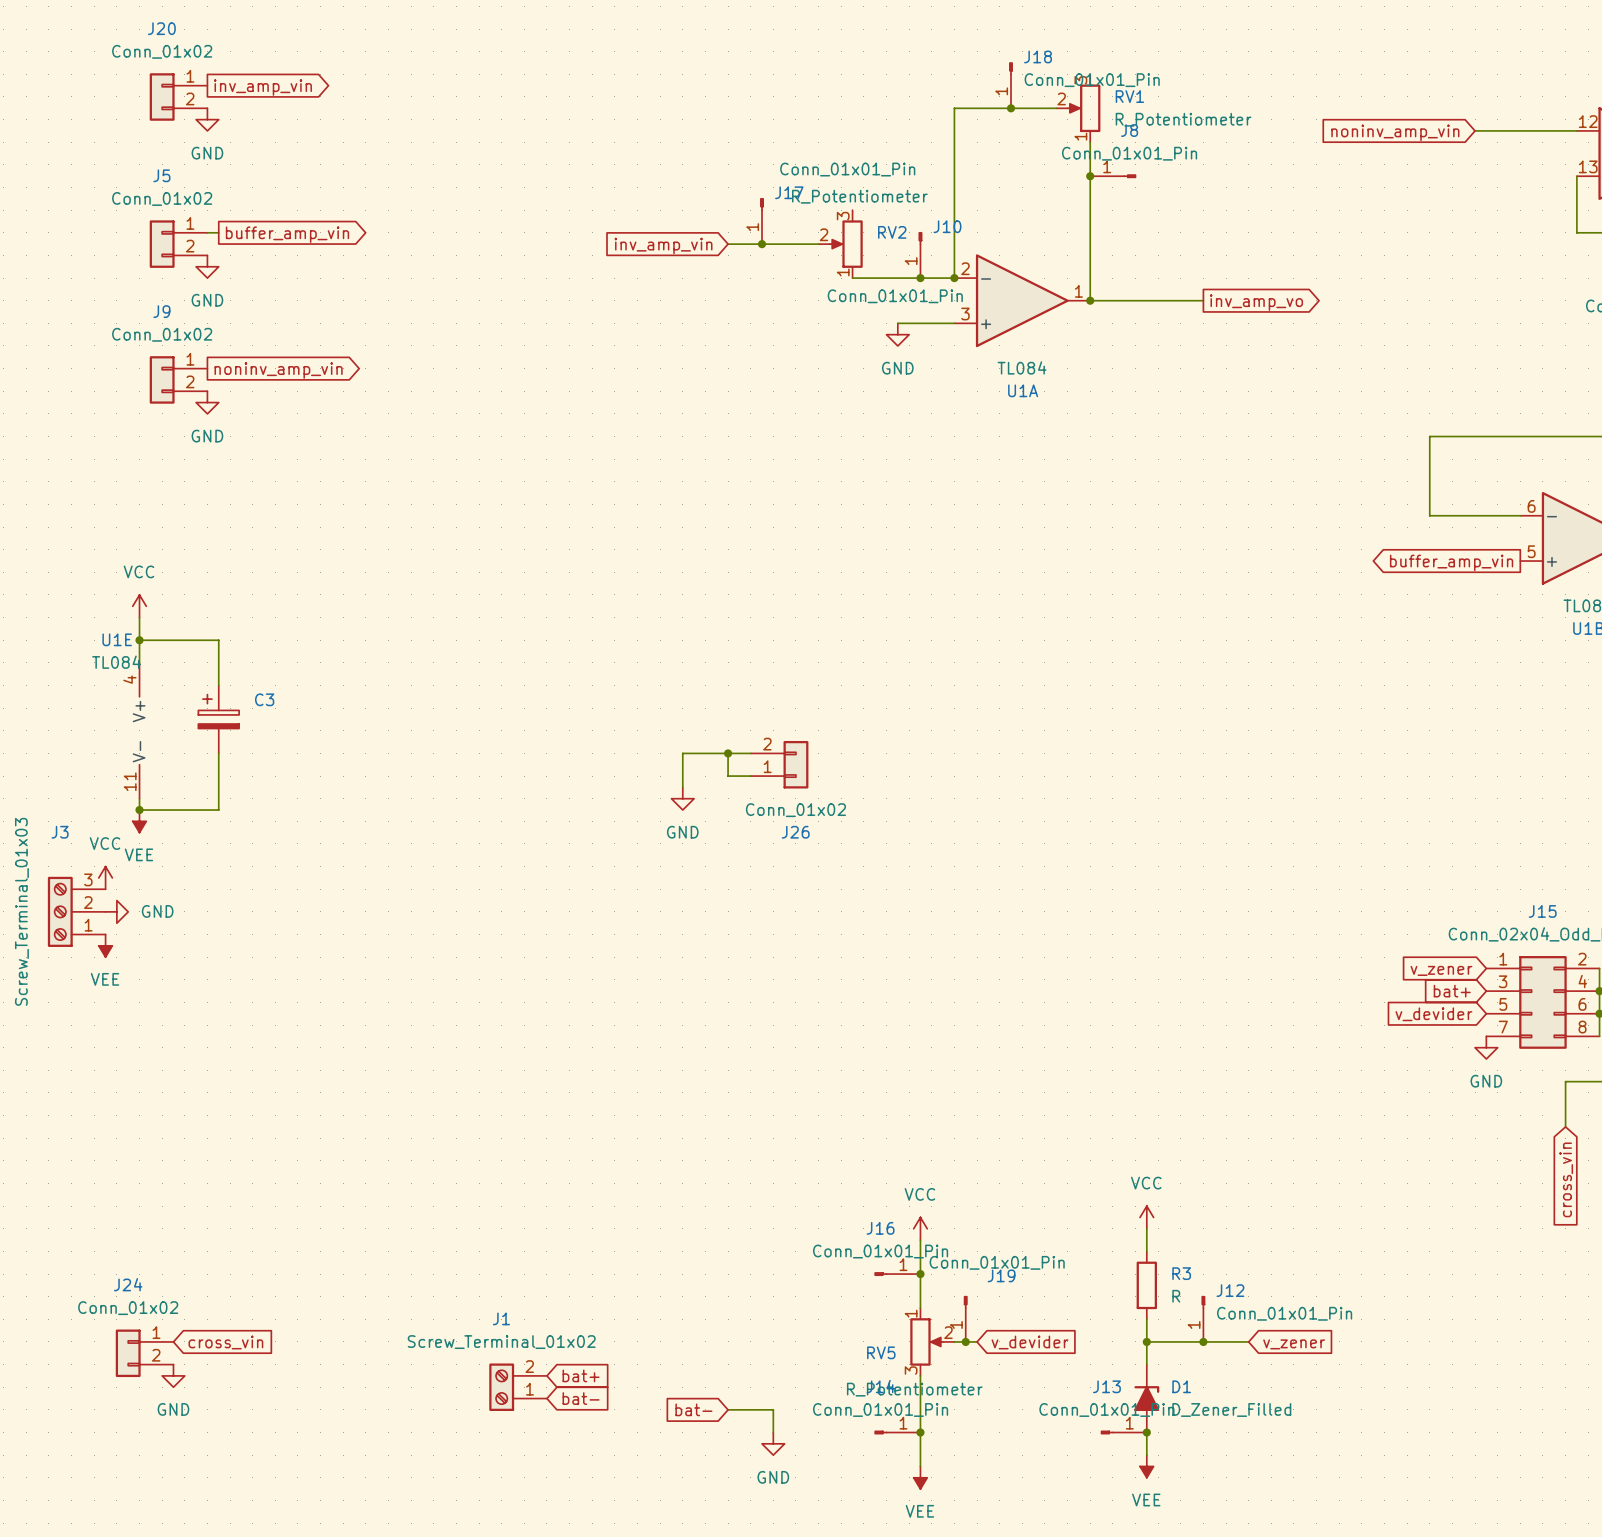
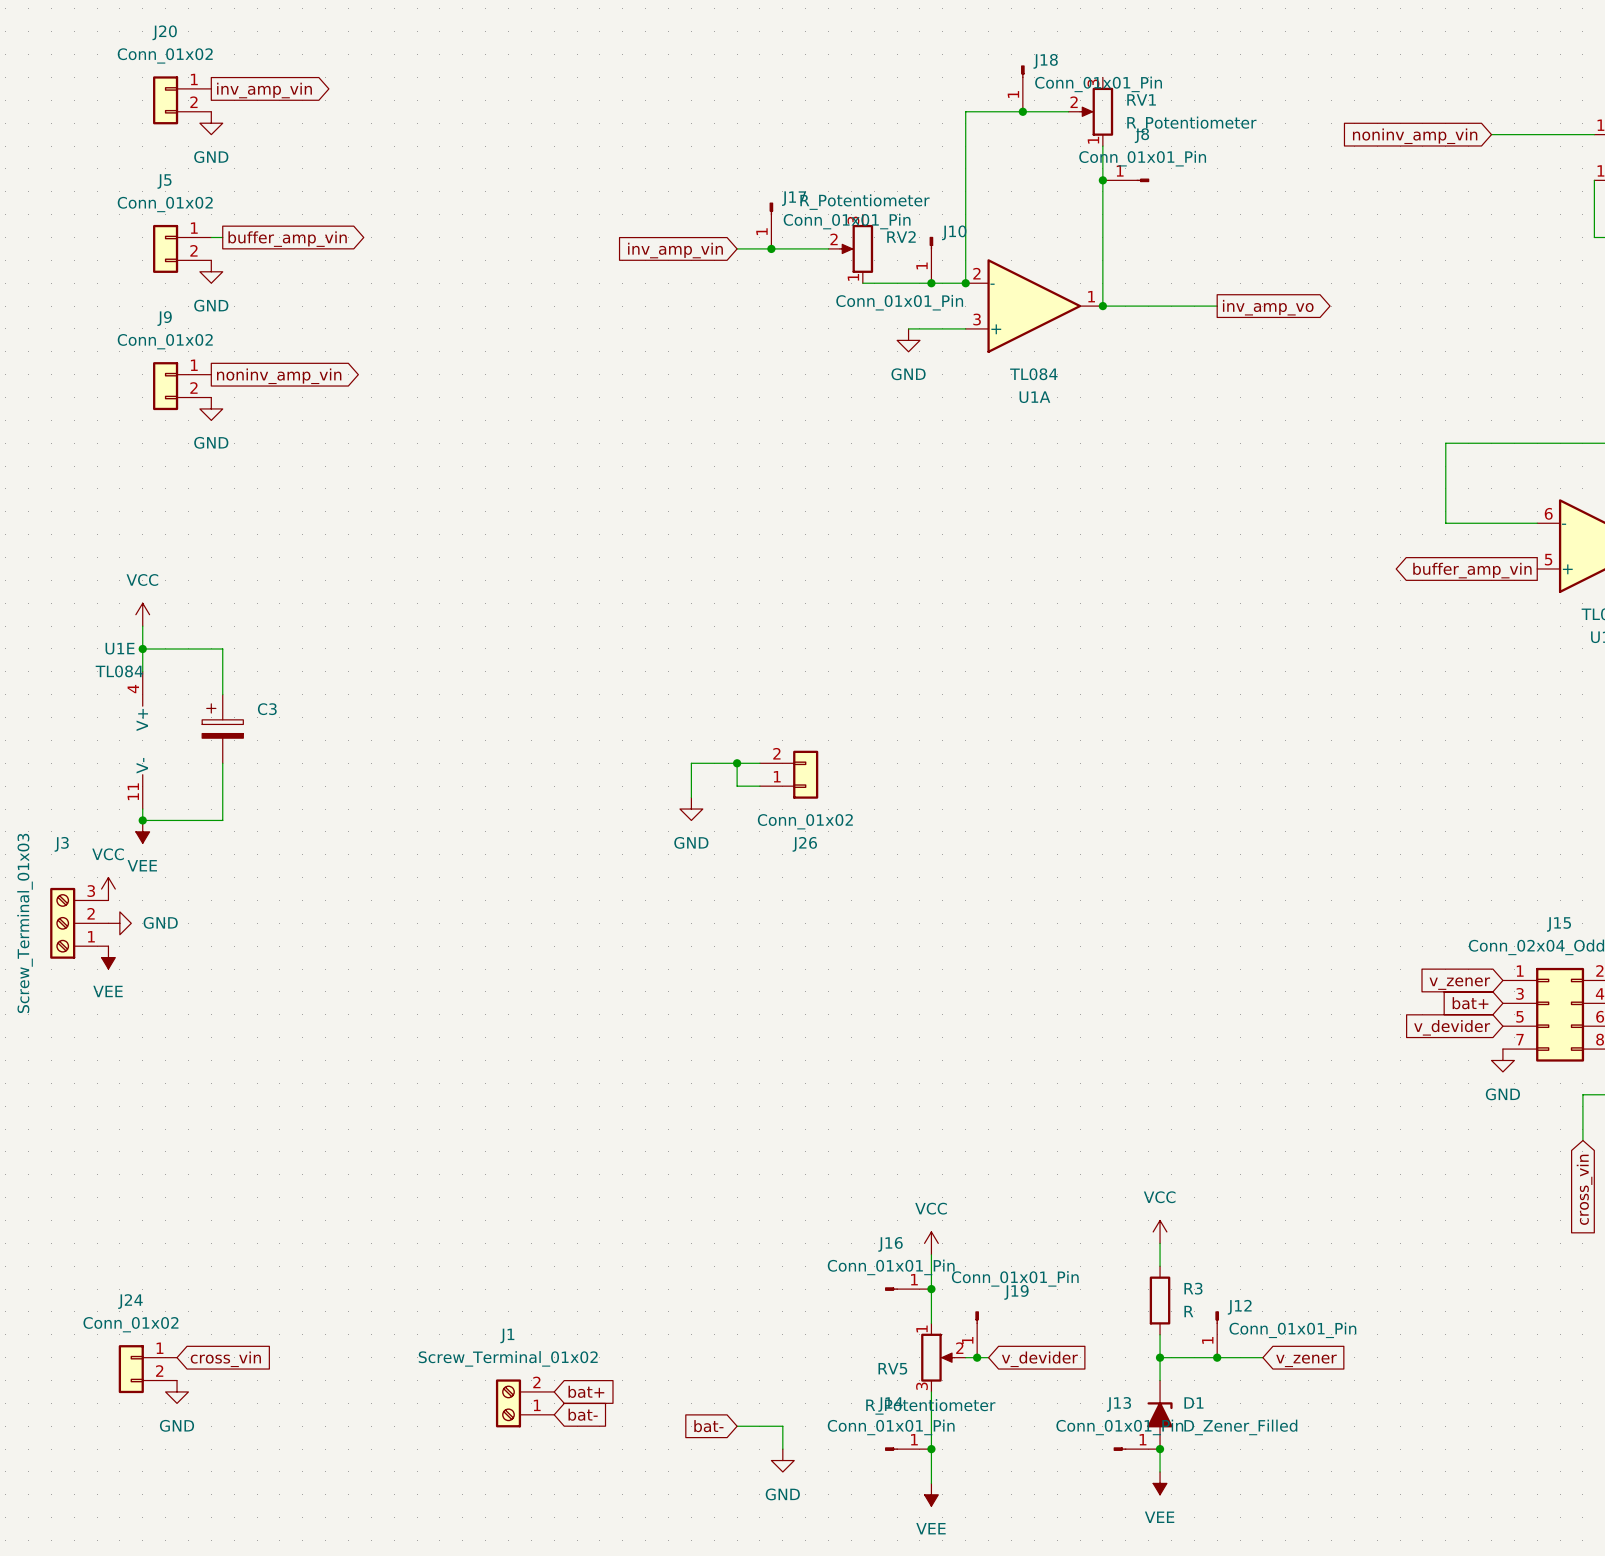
J17 value position: Conn_01x01_Pin (847, 169) -> Conn_01x01_Pin (847, 221)

